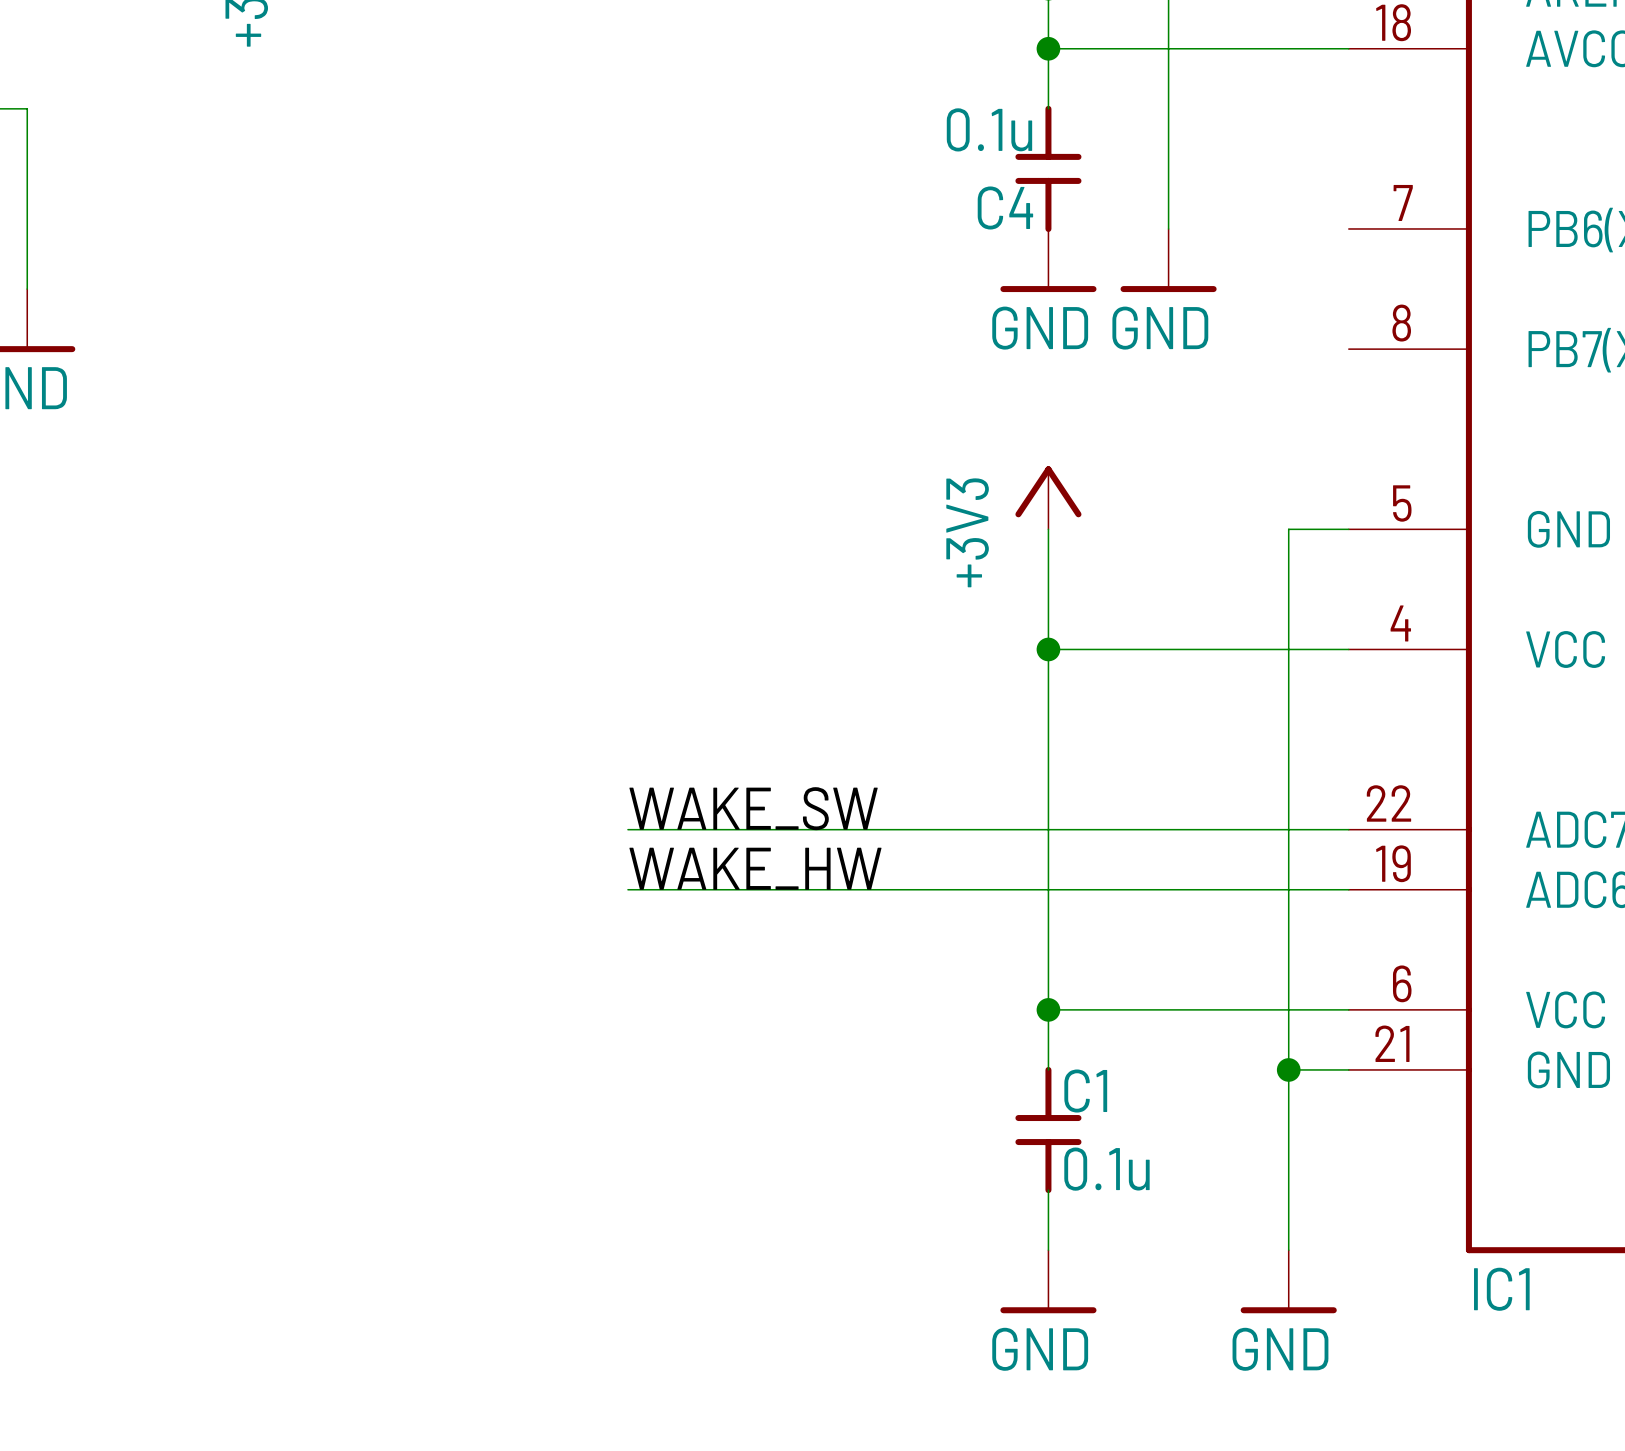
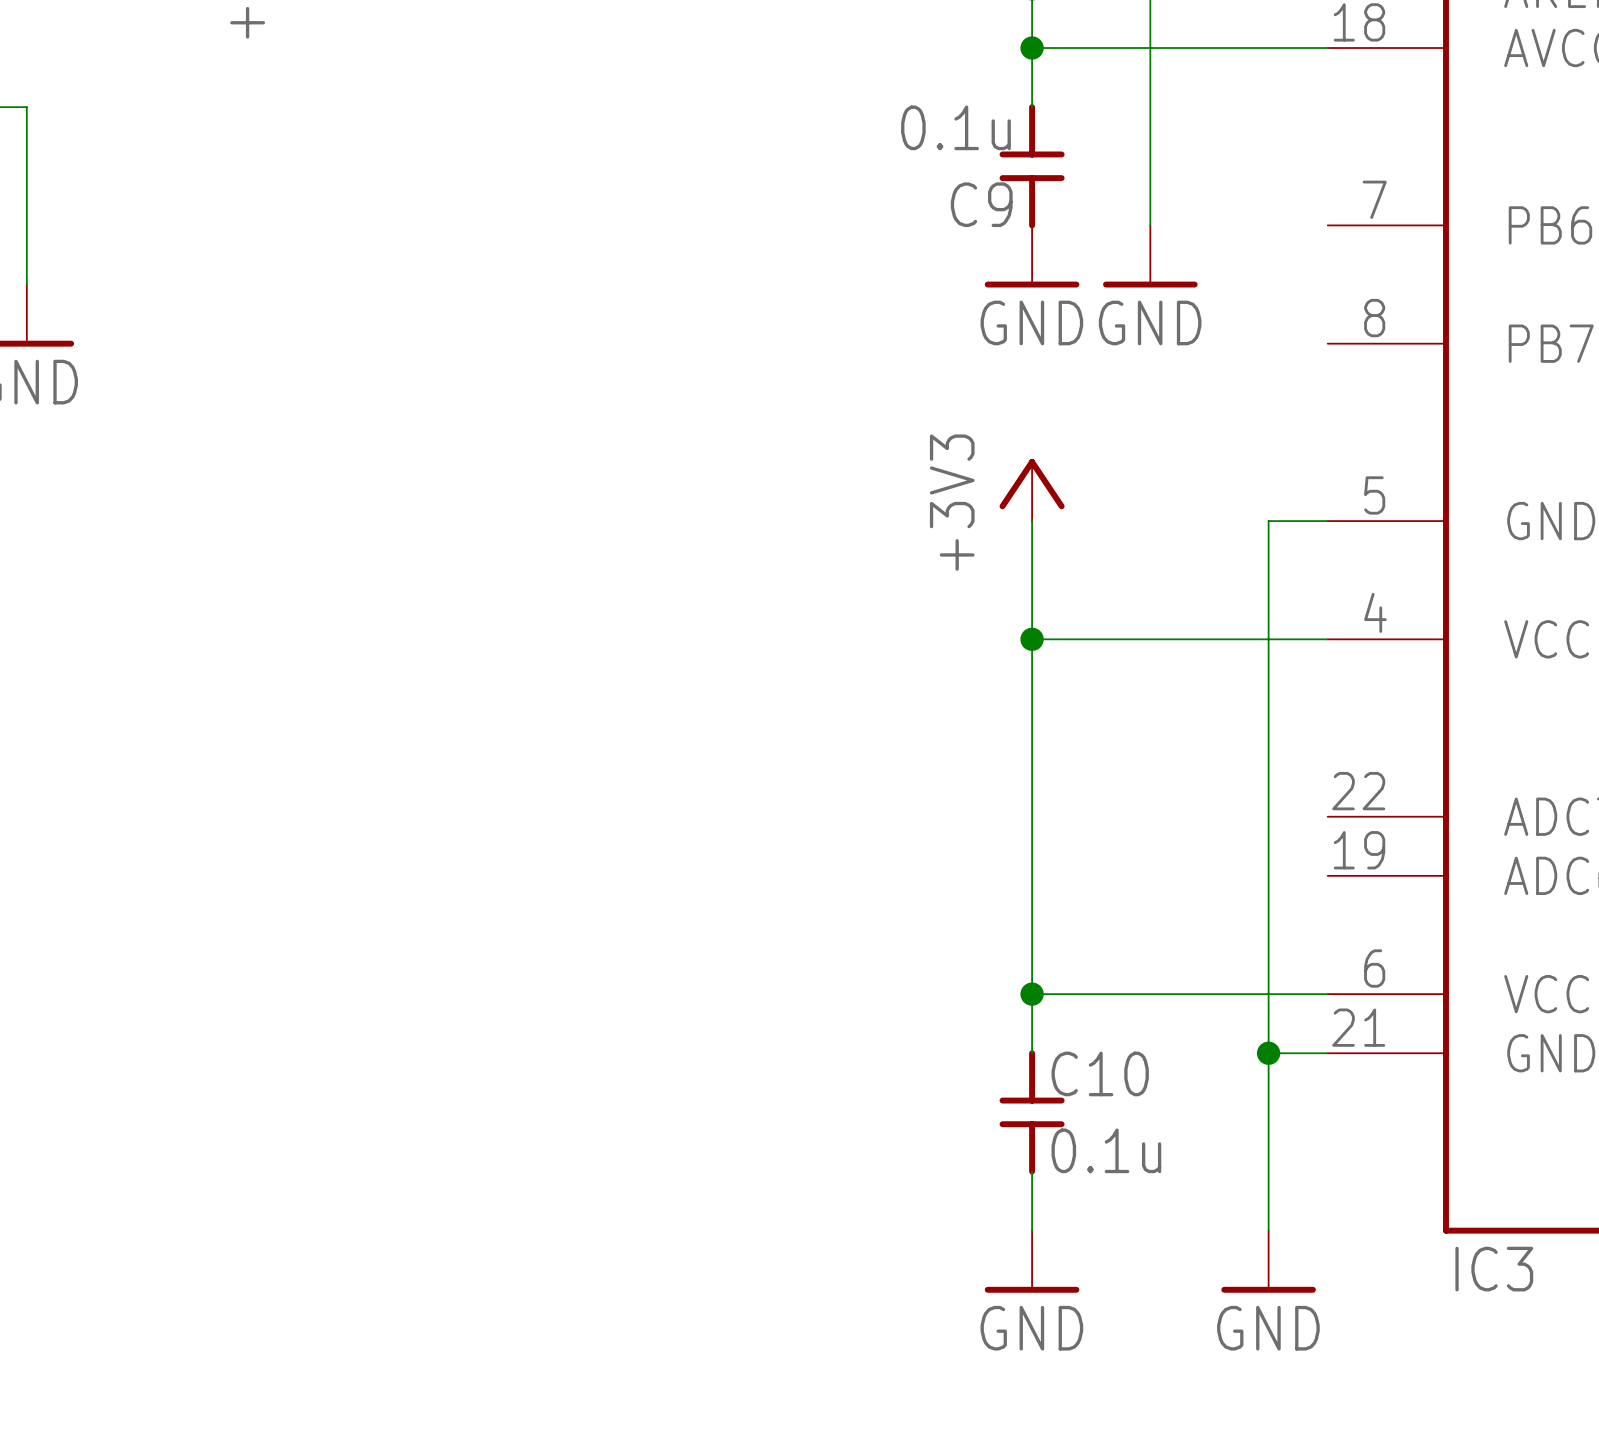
C4 name: C4 (1005, 207) -> C9 (981, 204)
label: WAKE_SW (753, 808) -> none
wire: (627, 829) (1348, 829) -> none
label: WAKE_HW (755, 868) -> none
wire: (627, 889) (1348, 889) -> none
C1 name: C1 (1085, 1091) -> C10 (1100, 1073)
IC1 name: IC1 (1501, 1289) -> IC3 (1494, 1269)

